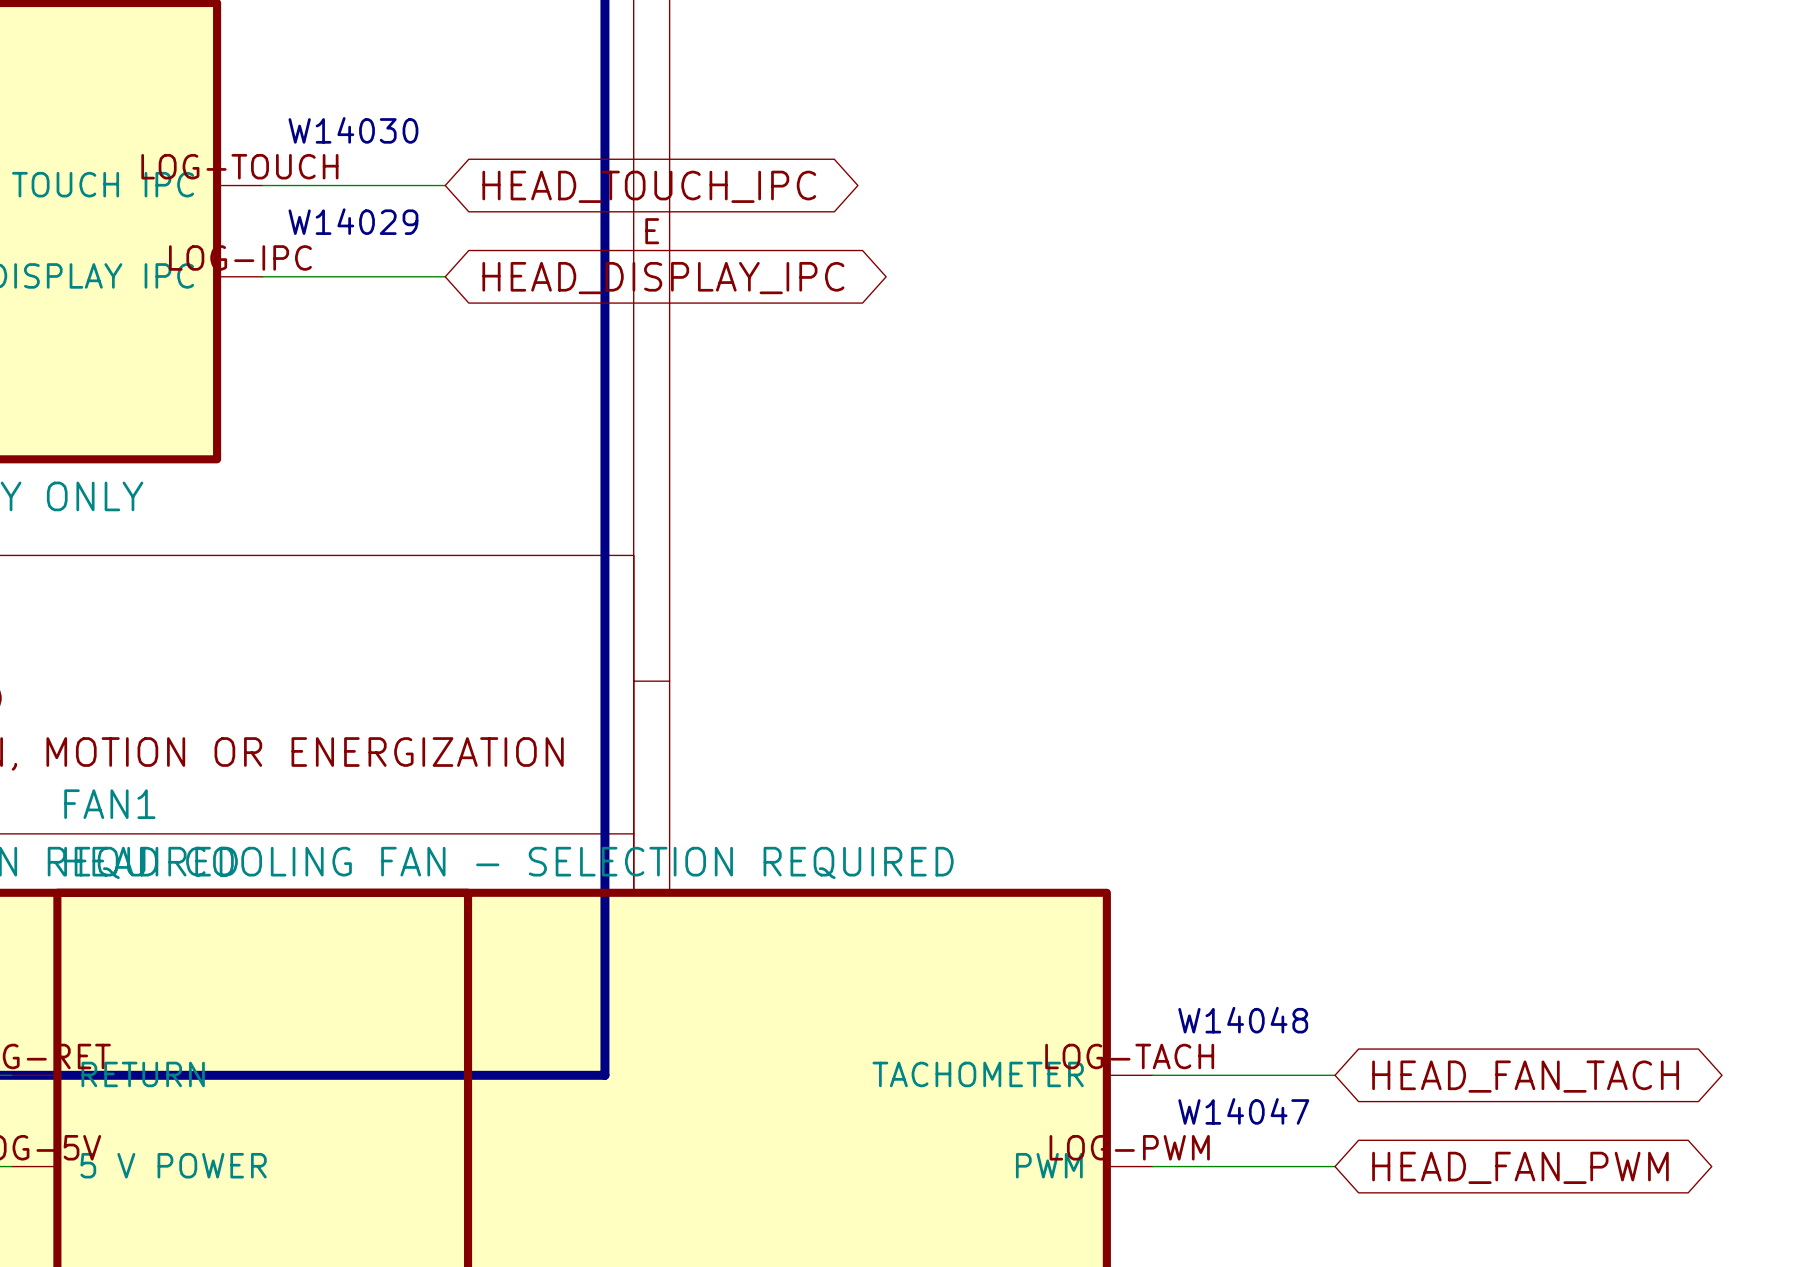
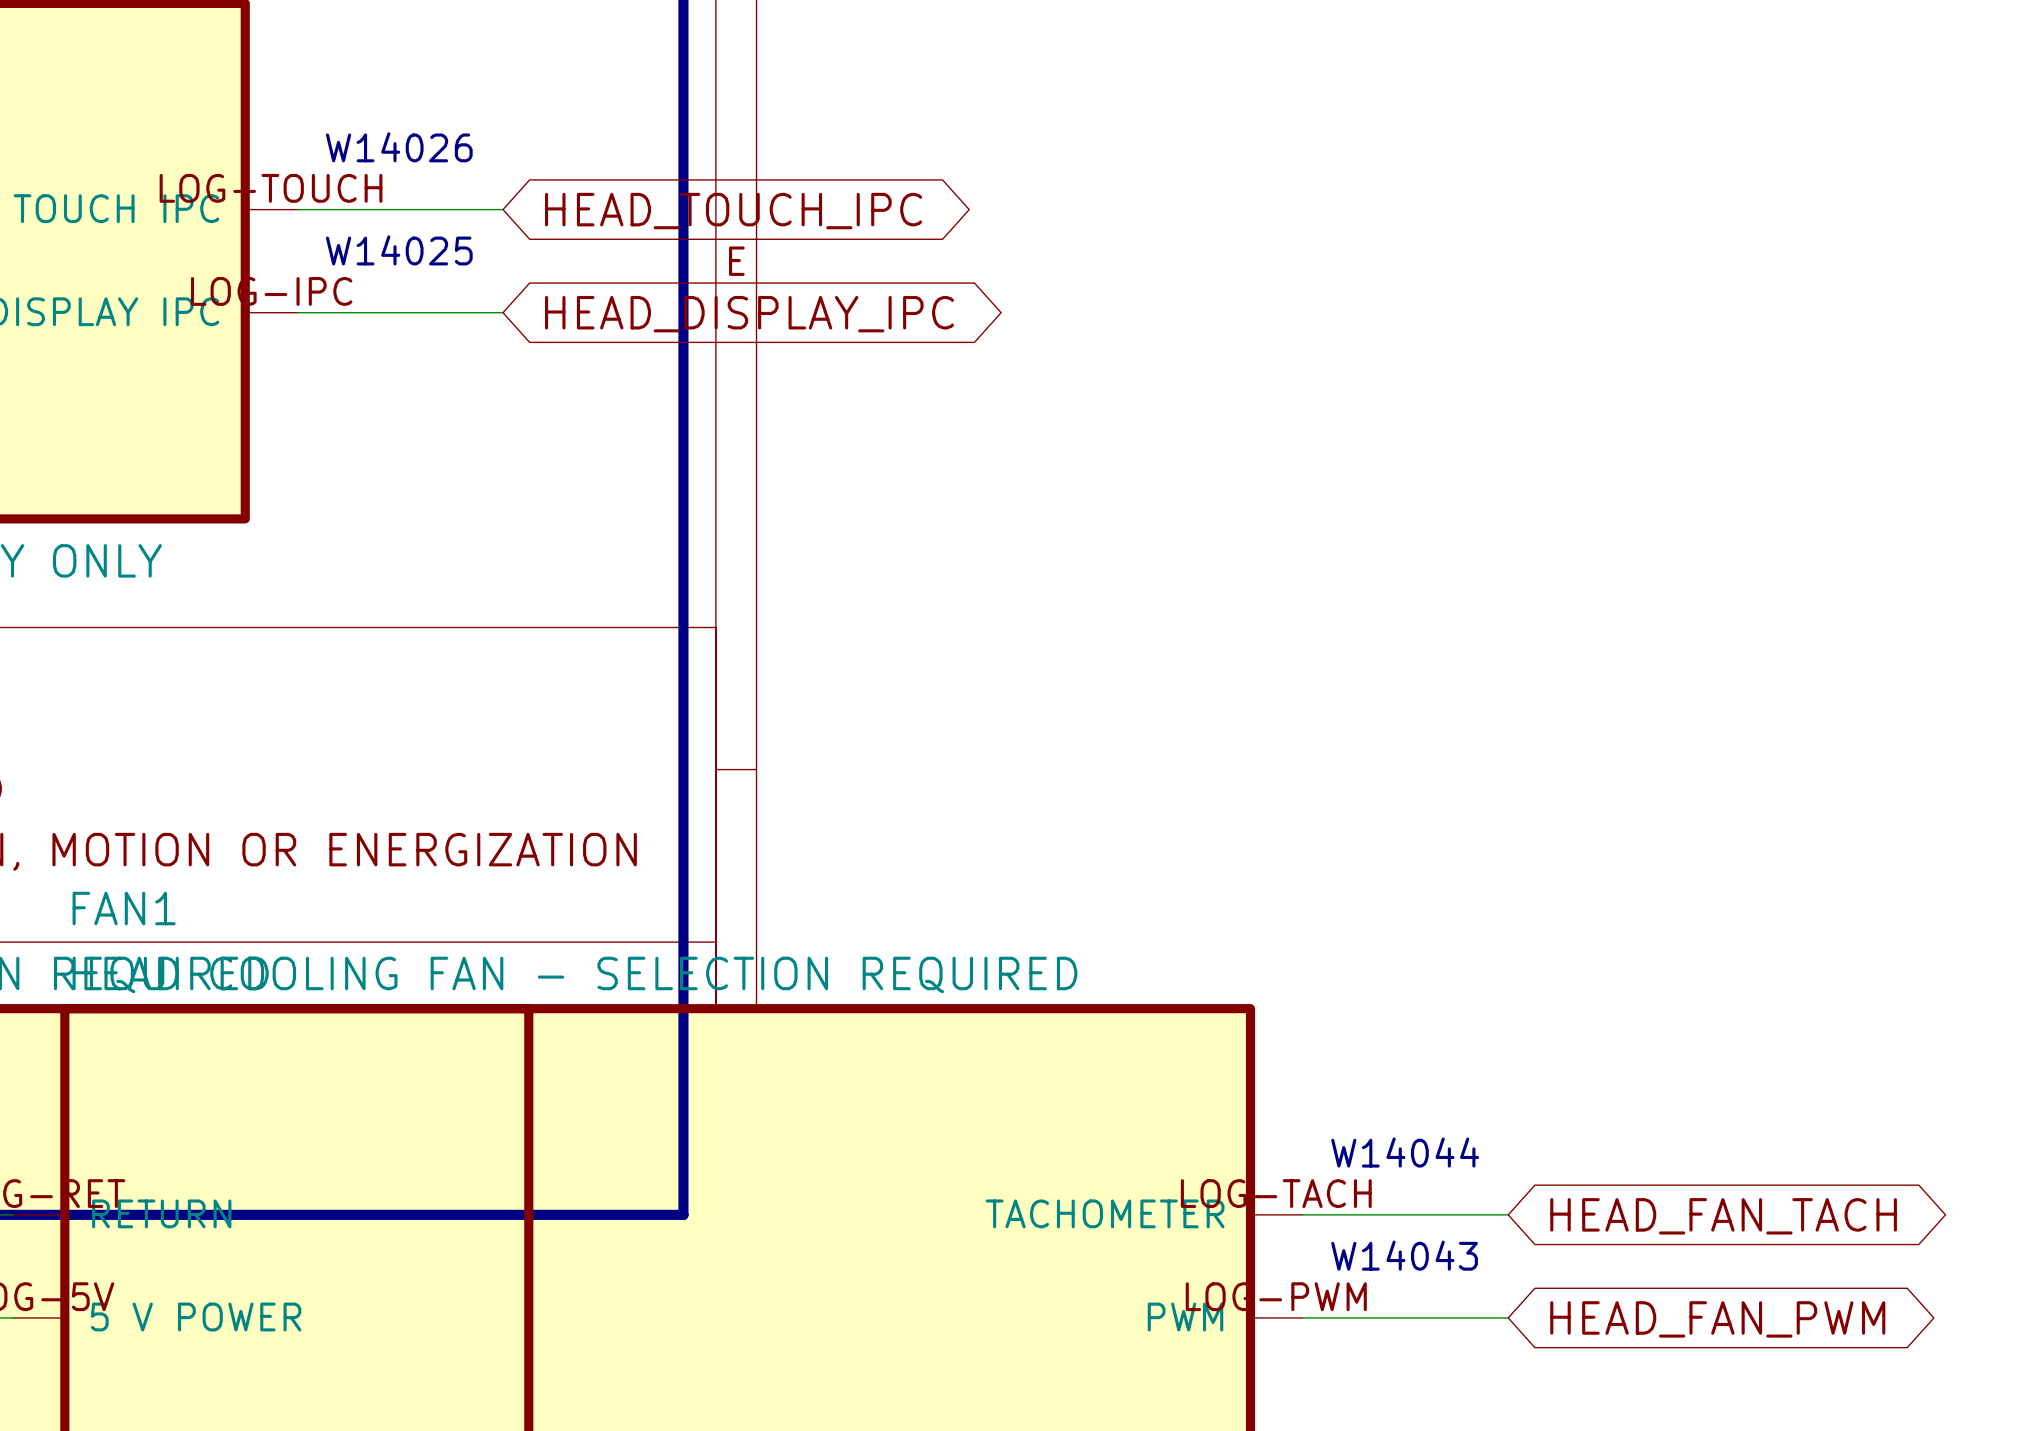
text: W14030 (353, 130) -> W14026 (399, 147)
text: W14029 (353, 221) -> W14025 (399, 250)
text: W14048 (1243, 1020) -> W14044 (1405, 1152)
text: W14047 (1243, 1111) -> W14043 (1404, 1255)

